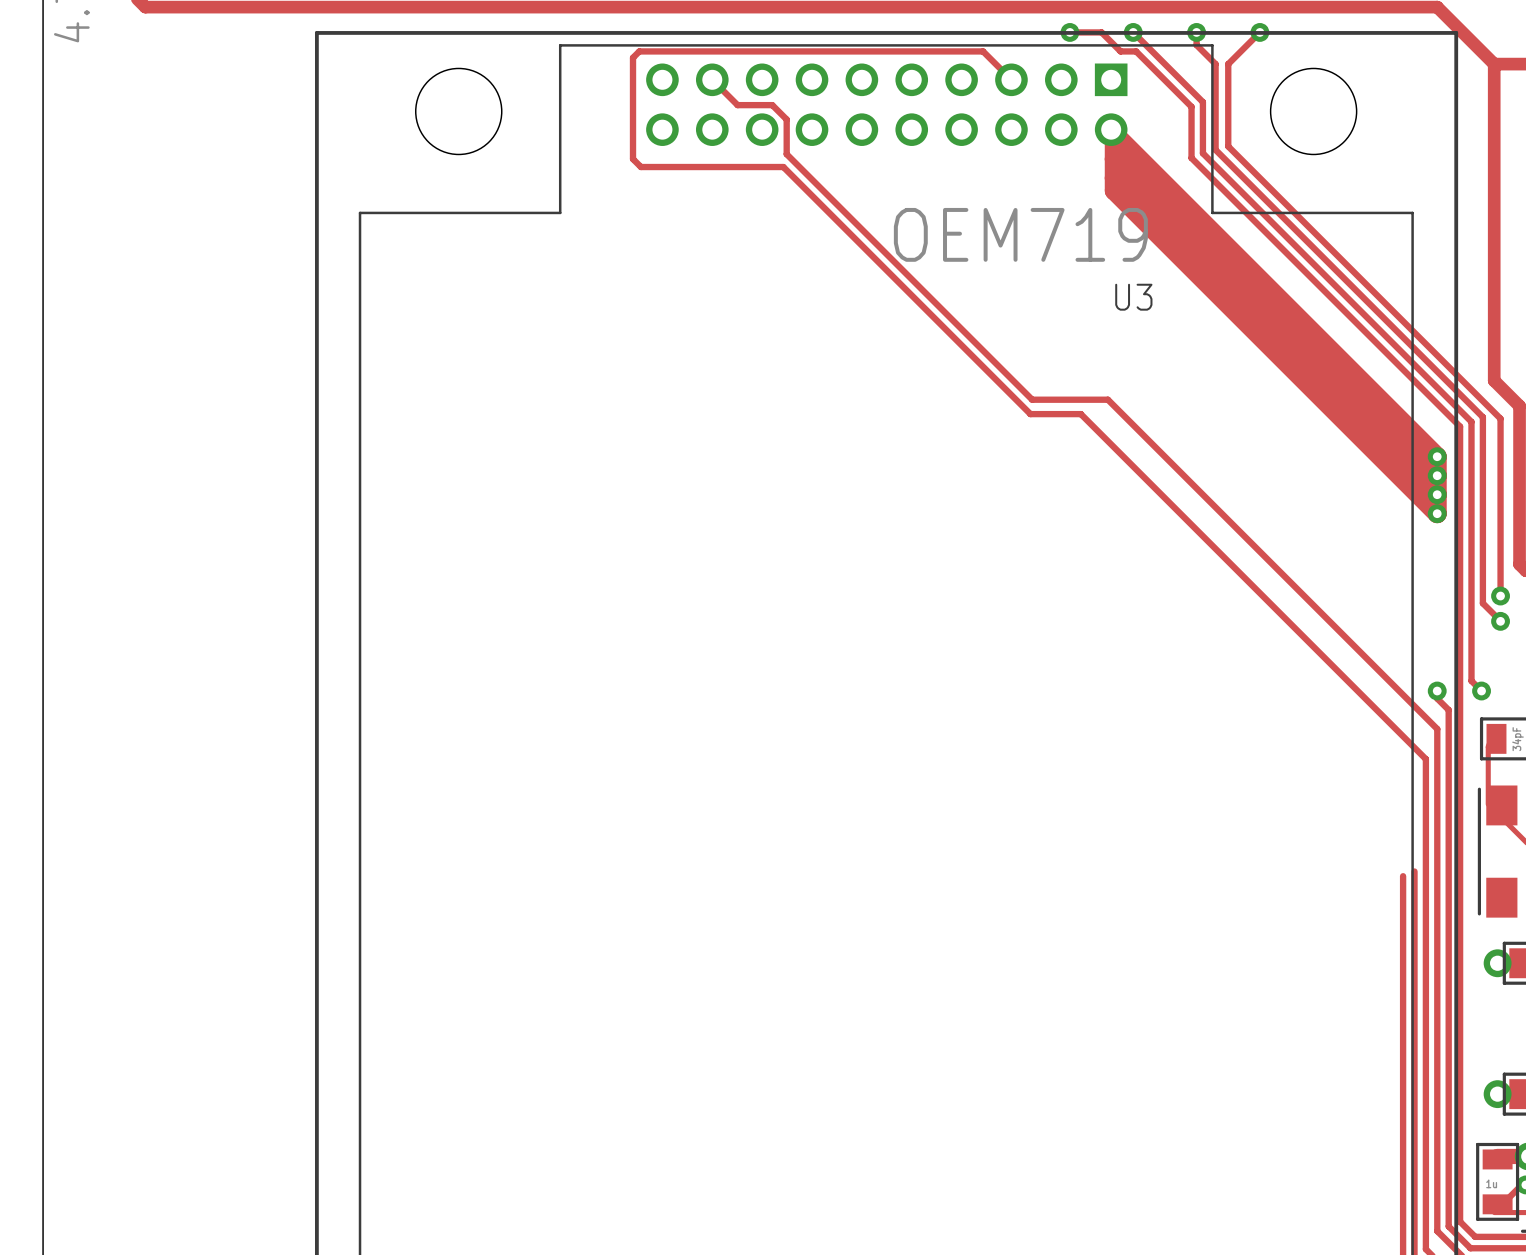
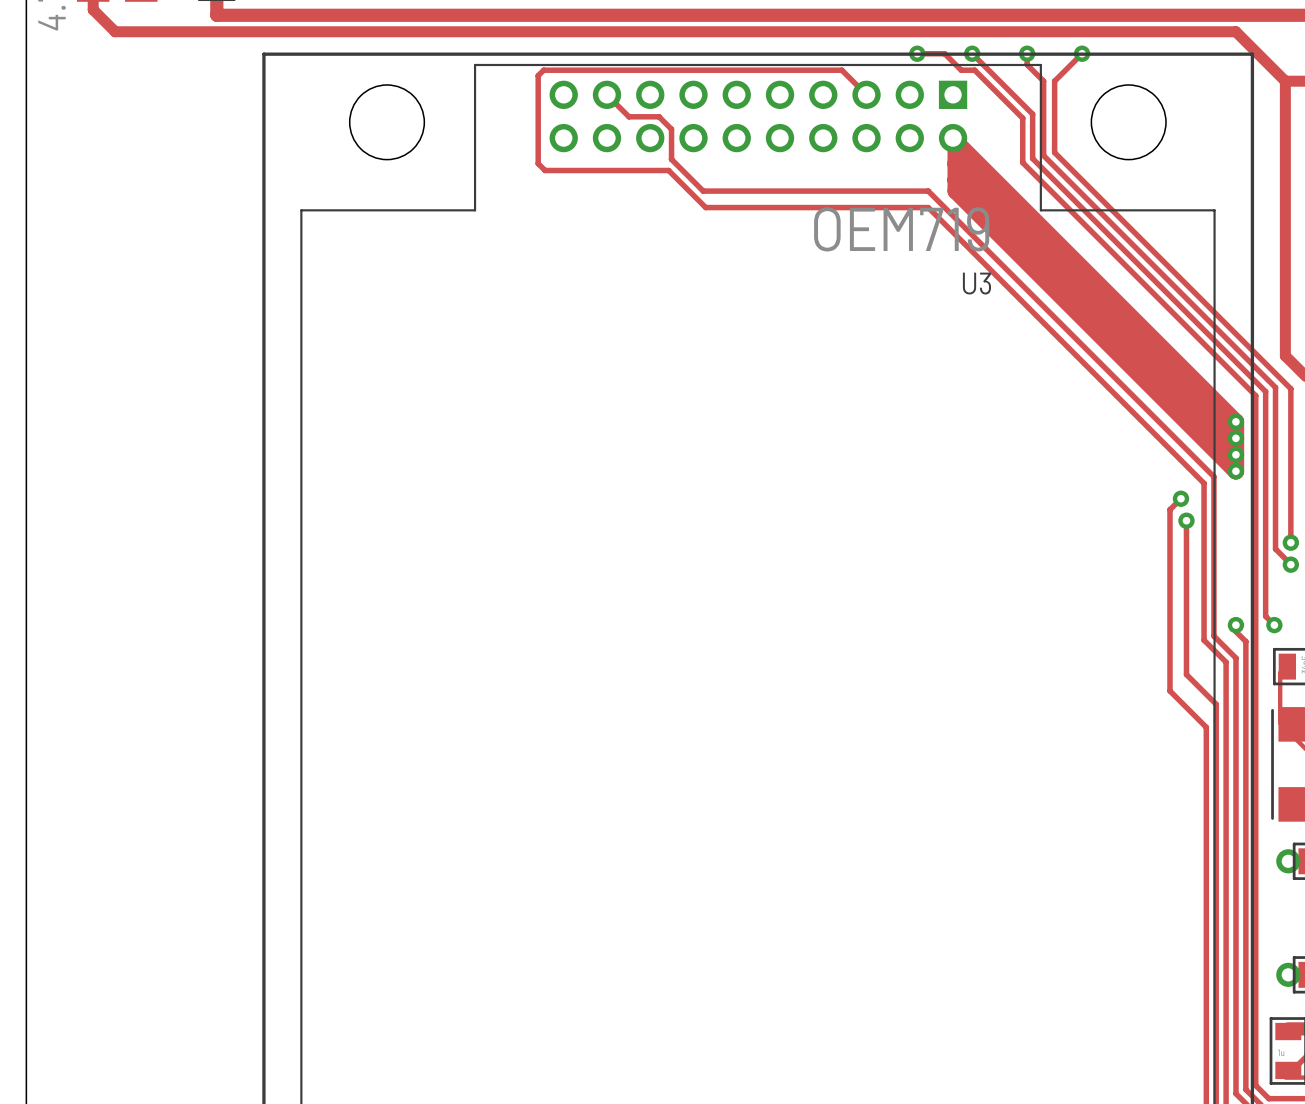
track: (823, 190) (1032, 399) (1107, 399) (1411, 703) -> (703, 191) (928, 191) (1213, 476) (1213, 636)
track: (826, 209) (1030, 414) (1080, 414) (1425, 759) -> (705, 207) (928, 207) (1204, 483) (1204, 640) (1226, 662) (1226, 684)
track: none -> (1180, 498) (1169, 509) (1169, 691) (1206, 727) (1206, 785)
via: none -> (1180, 498)
track: none -> (1186, 520) (1186, 674) (1216, 704) (1216, 781)
via: none -> (1186, 520)

